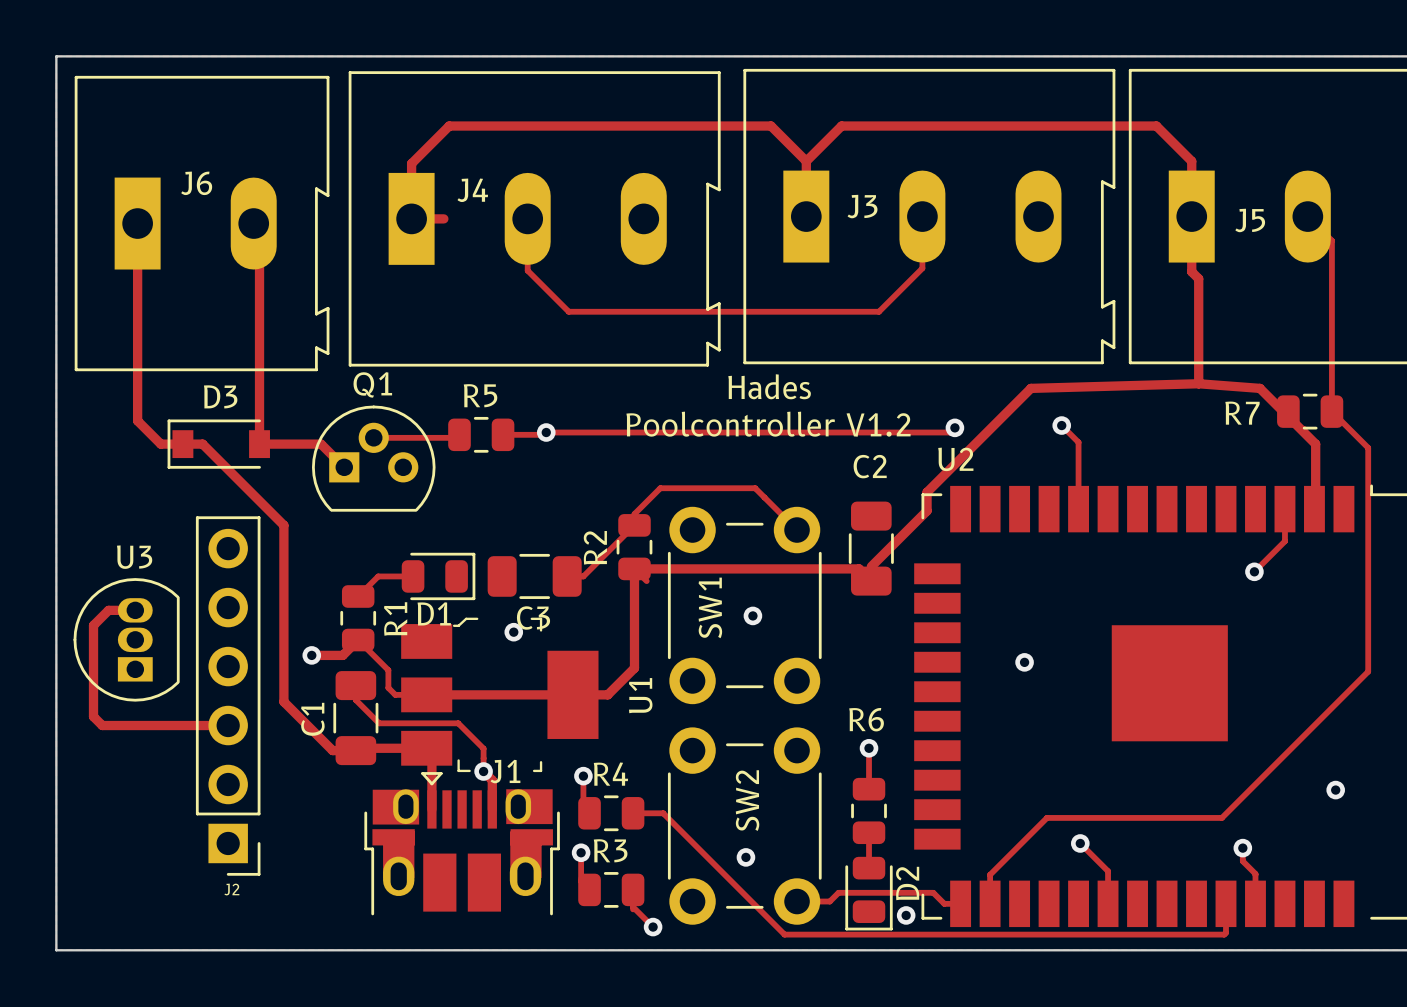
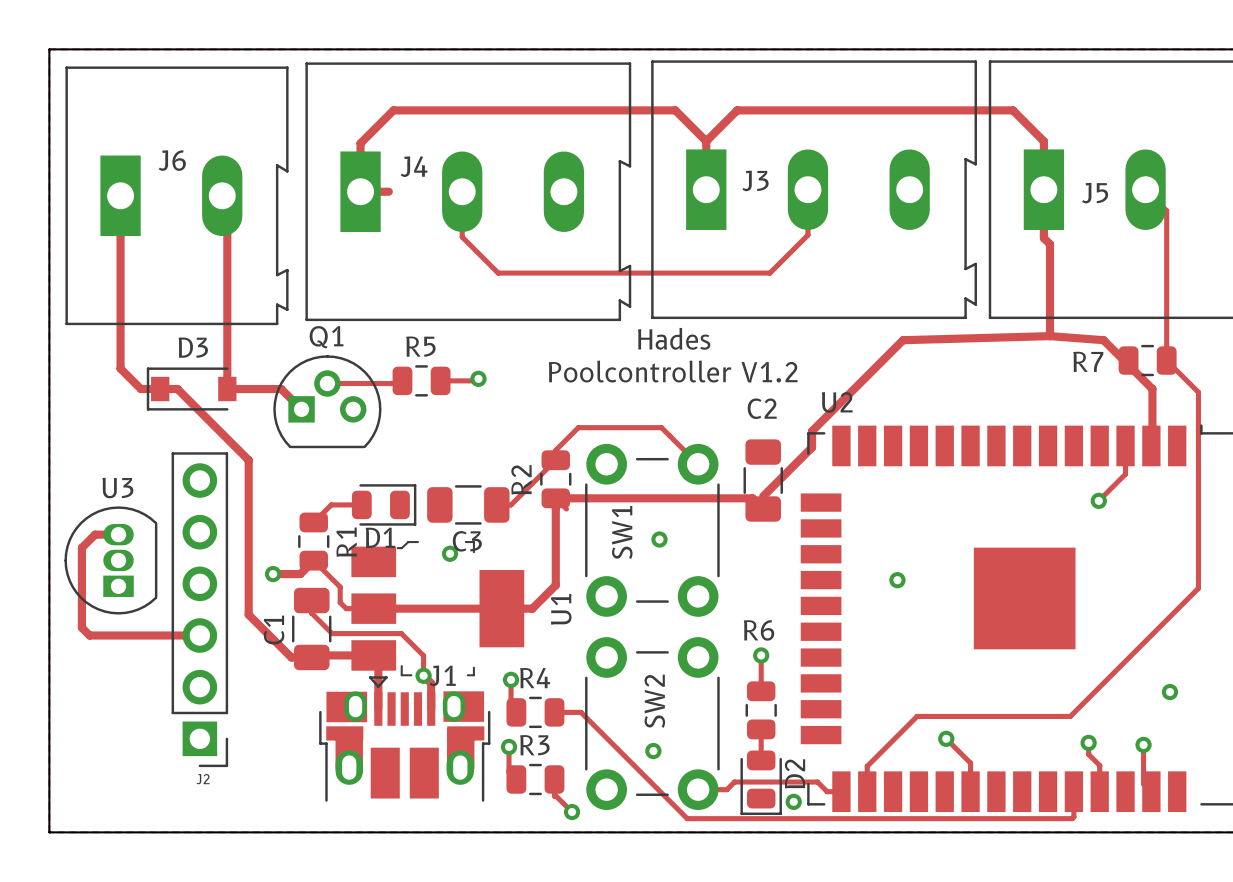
track: (1061, 425) (1078, 442) (1078, 509) -> none
via: (1061, 425) -> none
track: (954, 427) (950, 432) (546, 432) -> none
via: (954, 427) -> none
track: none -> (1143, 744) (1143, 783) (1151, 791)
via: none -> (1143, 744)

